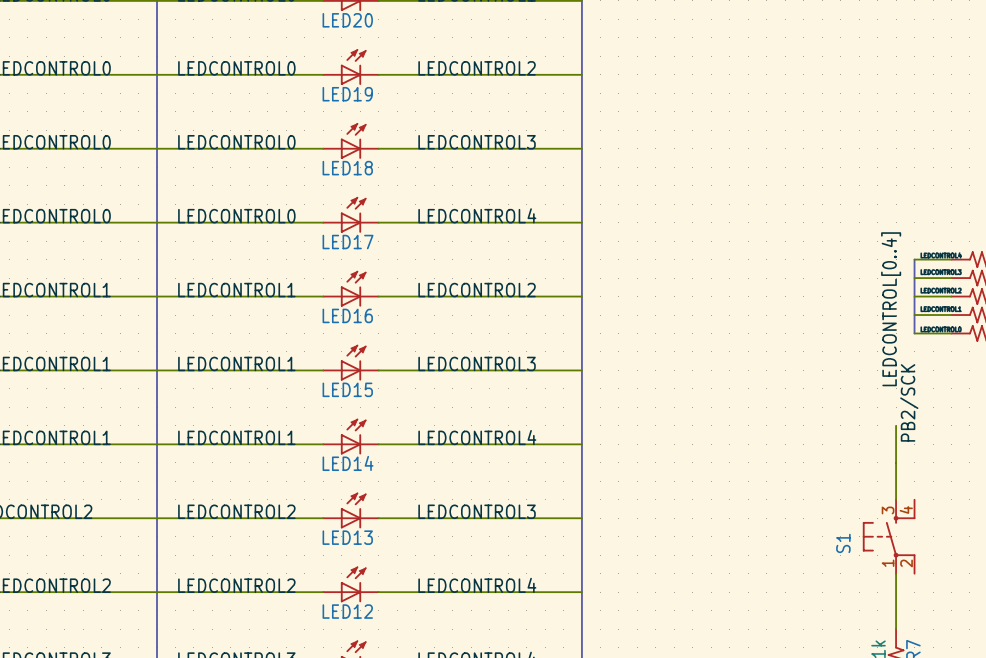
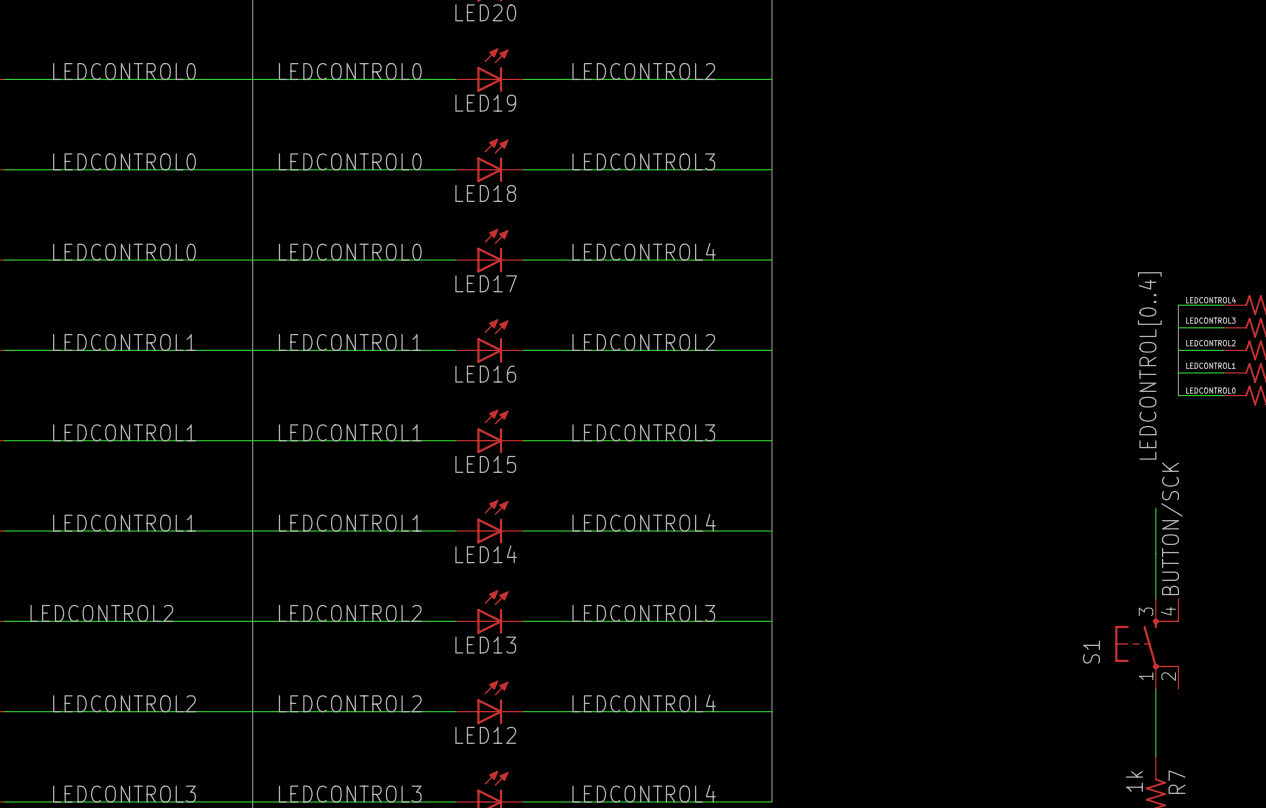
label: PB2/SCK (909, 402) -> none
label: none -> BUTTON/SCK (1172, 528)

